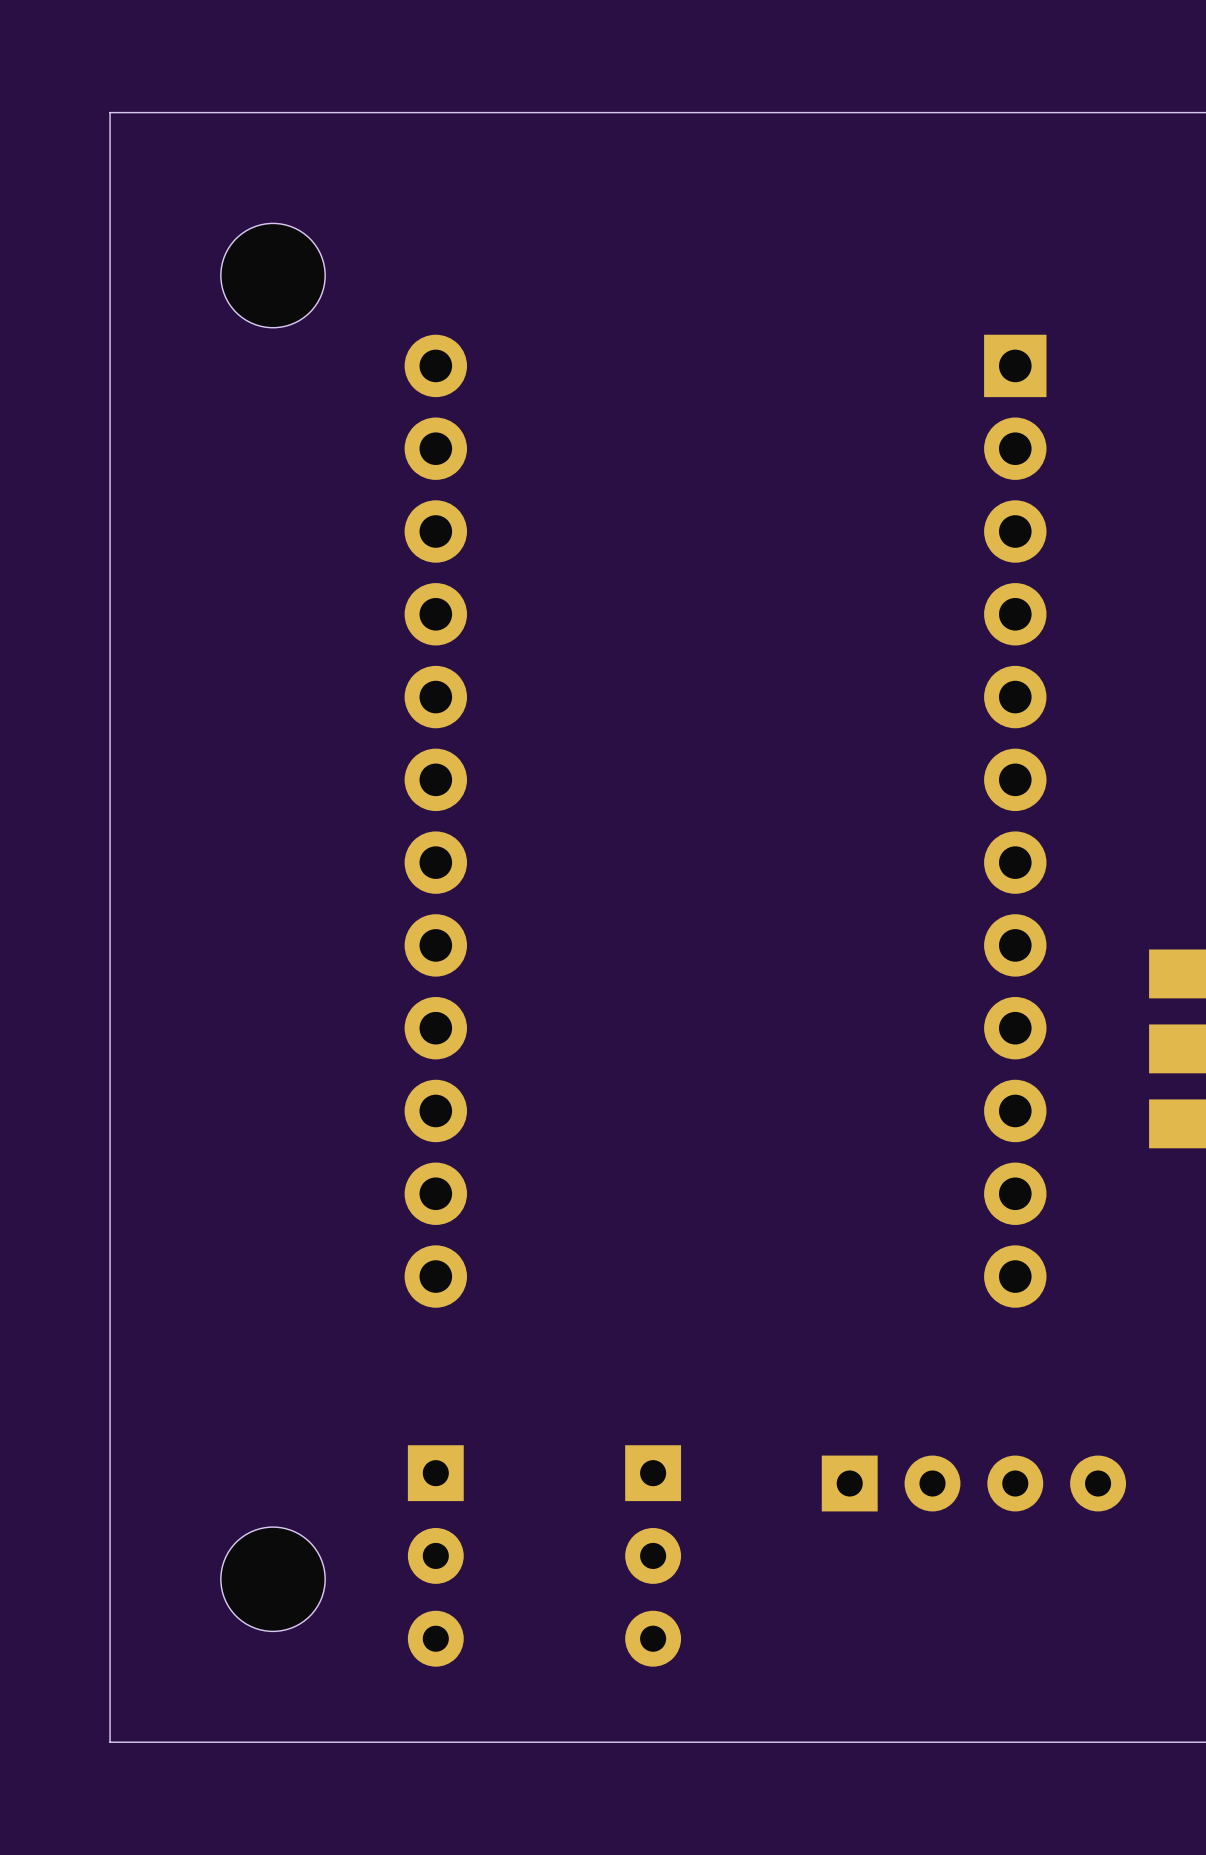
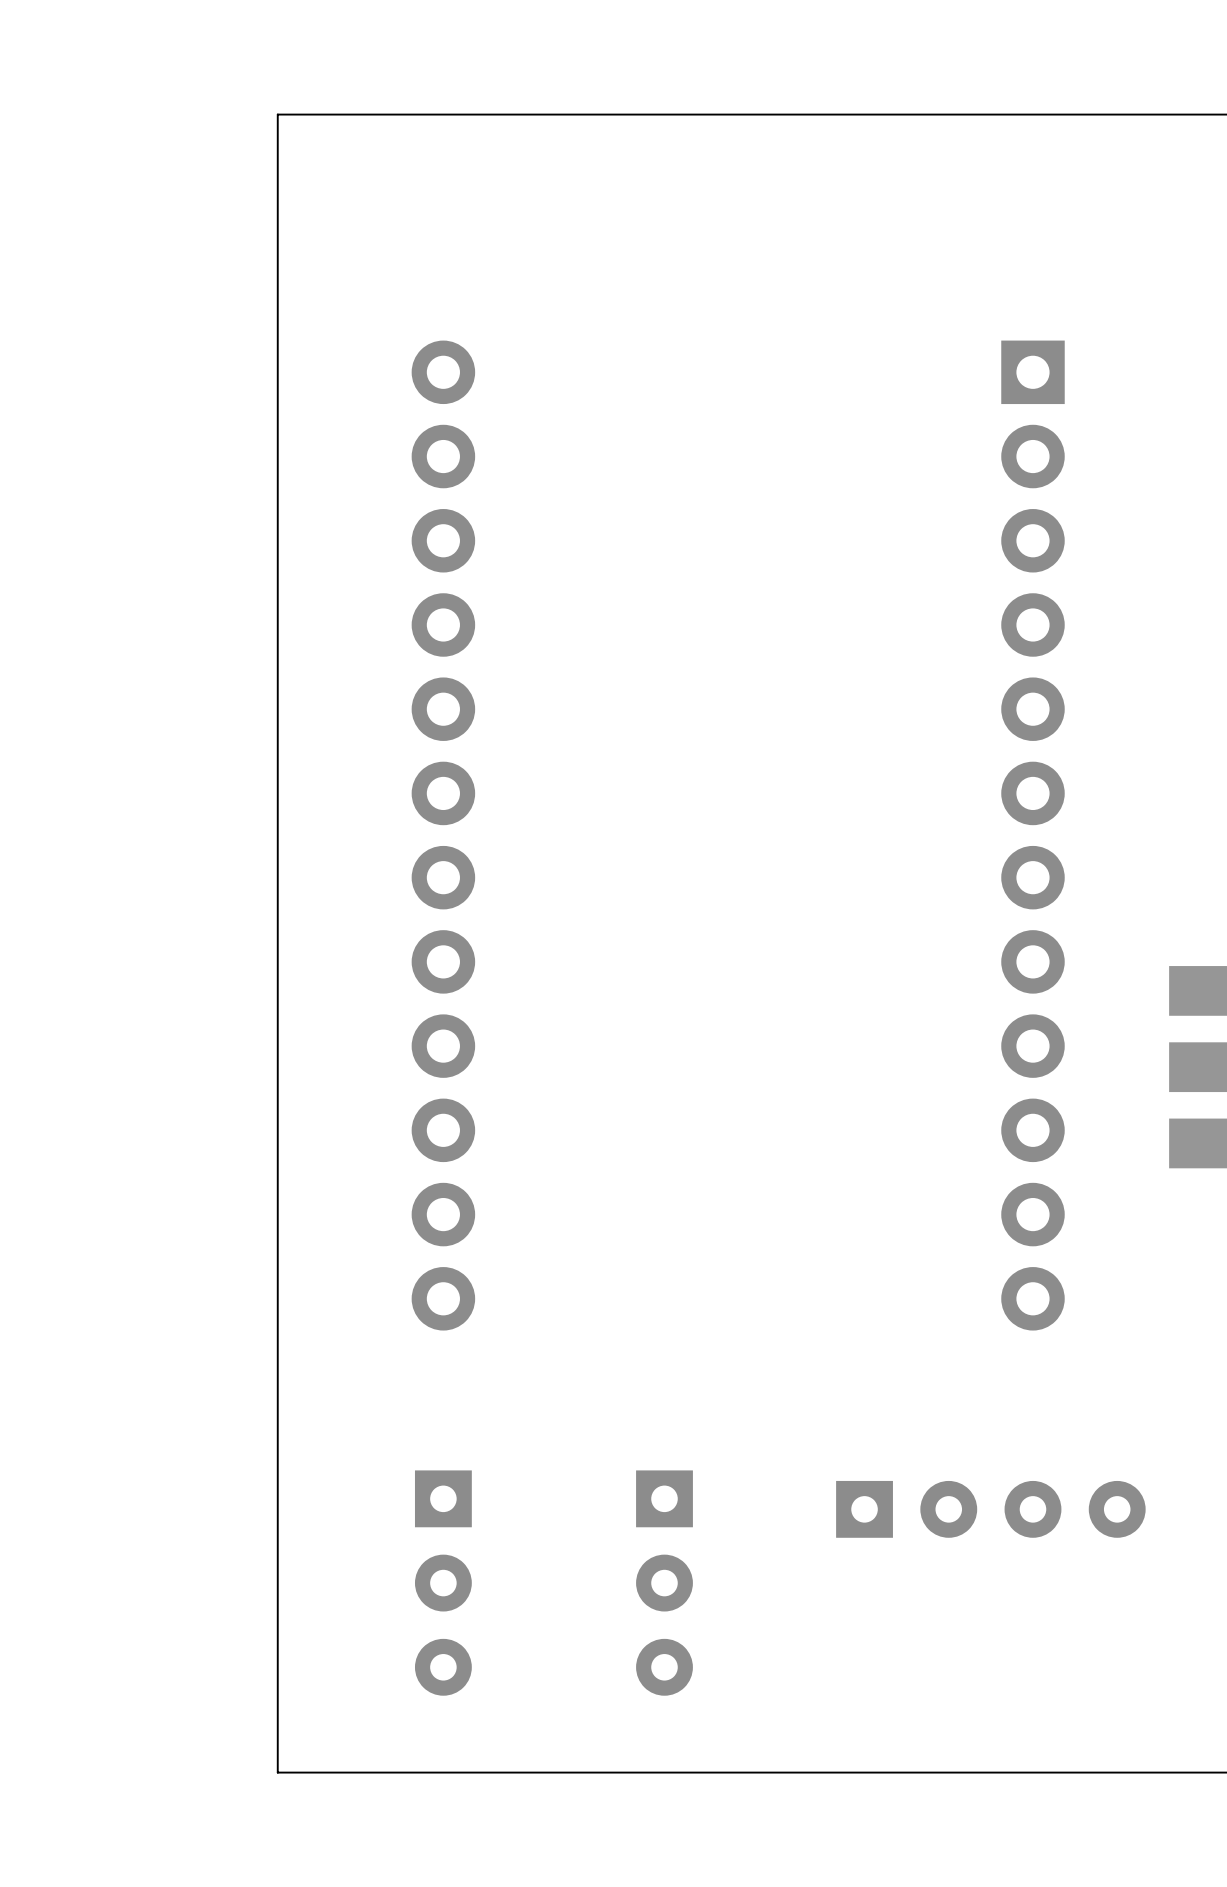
board edge: (273, 112) (110, 112) (110, 1742) (273, 1742) -> (277, 114) (277, 1772)
hole: (273, 275) -> none
hole: (273, 1579) -> none

